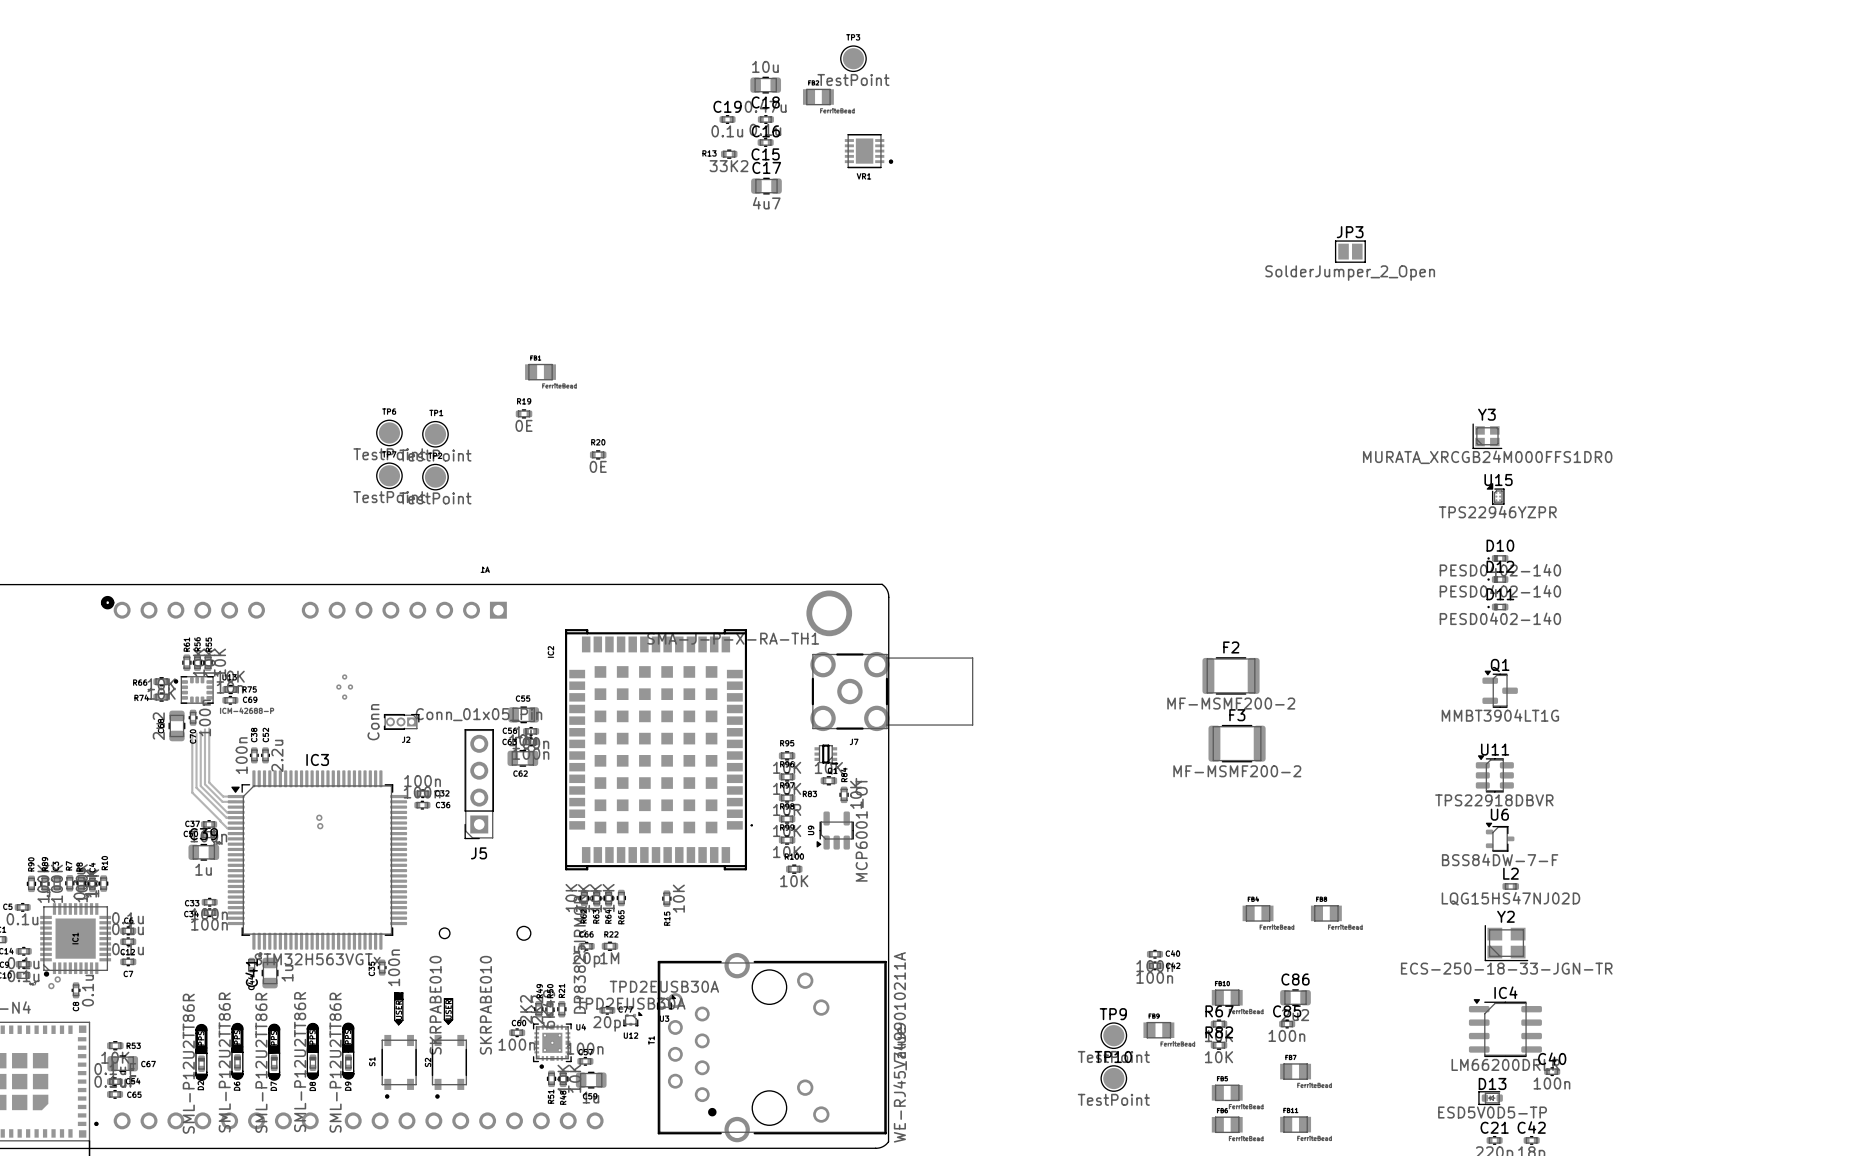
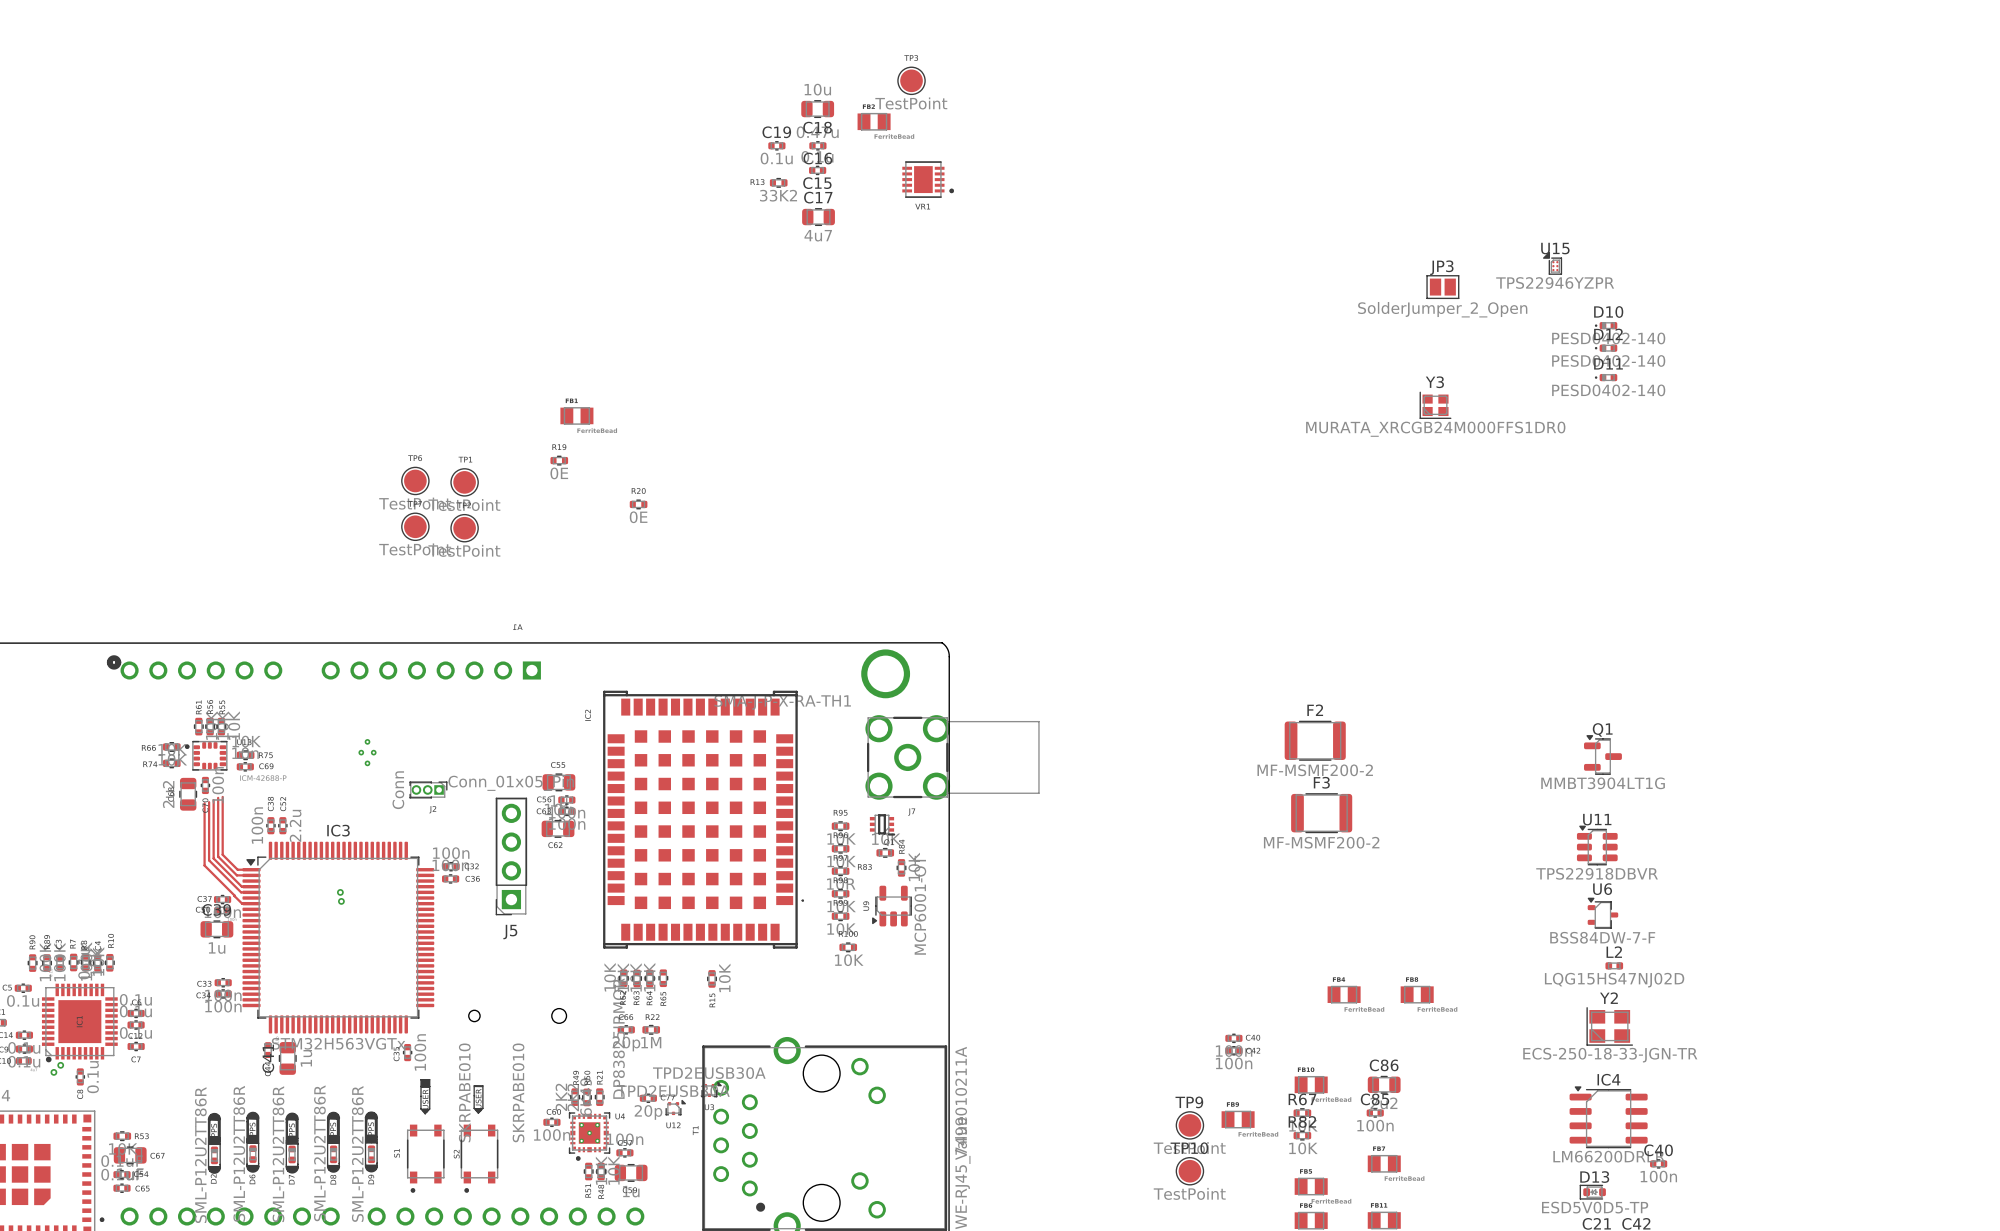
Y3 position: (1487, 436) -> (1435, 405)
U15 position: (1495, 493) -> (1552, 263)
D10 position: (1497, 558) -> (1606, 325)
D12 position: (1497, 579) -> (1606, 348)
D11 position: (1497, 607) -> (1606, 377)

